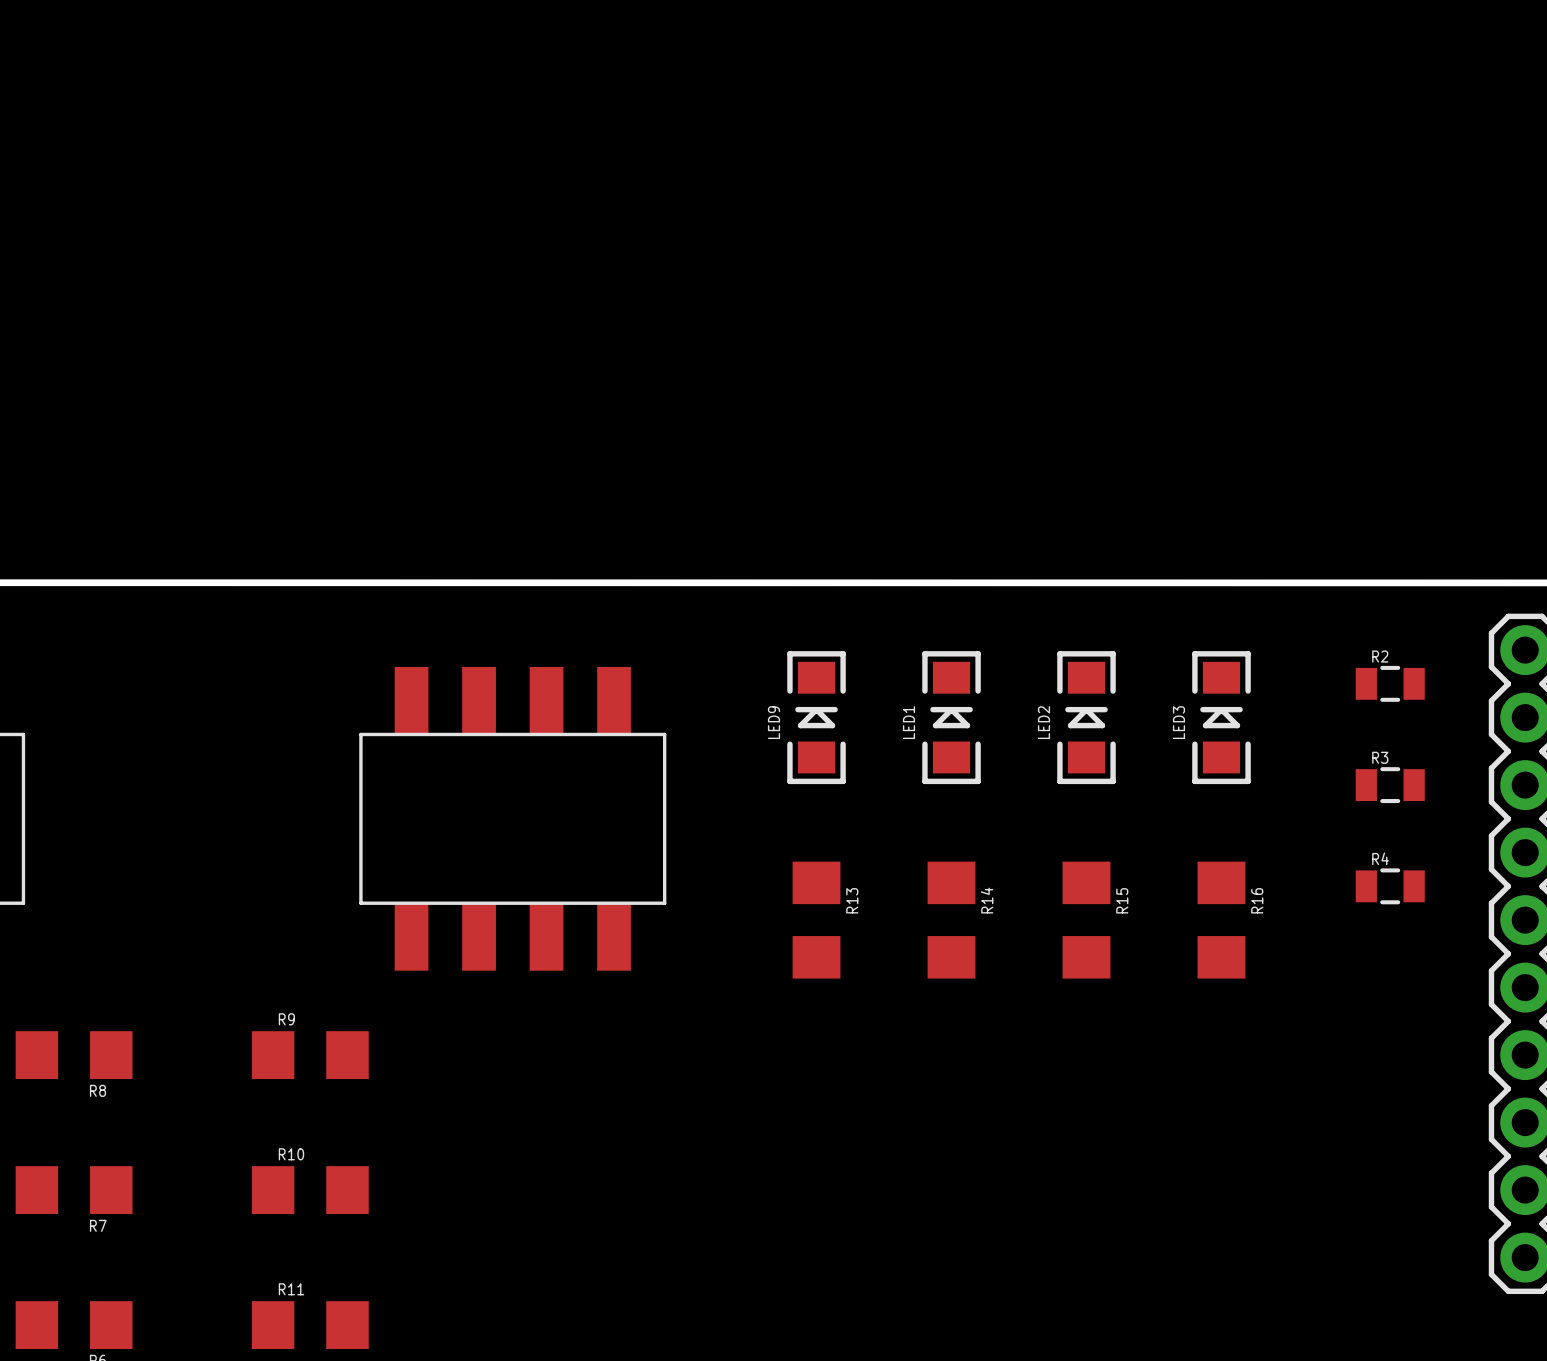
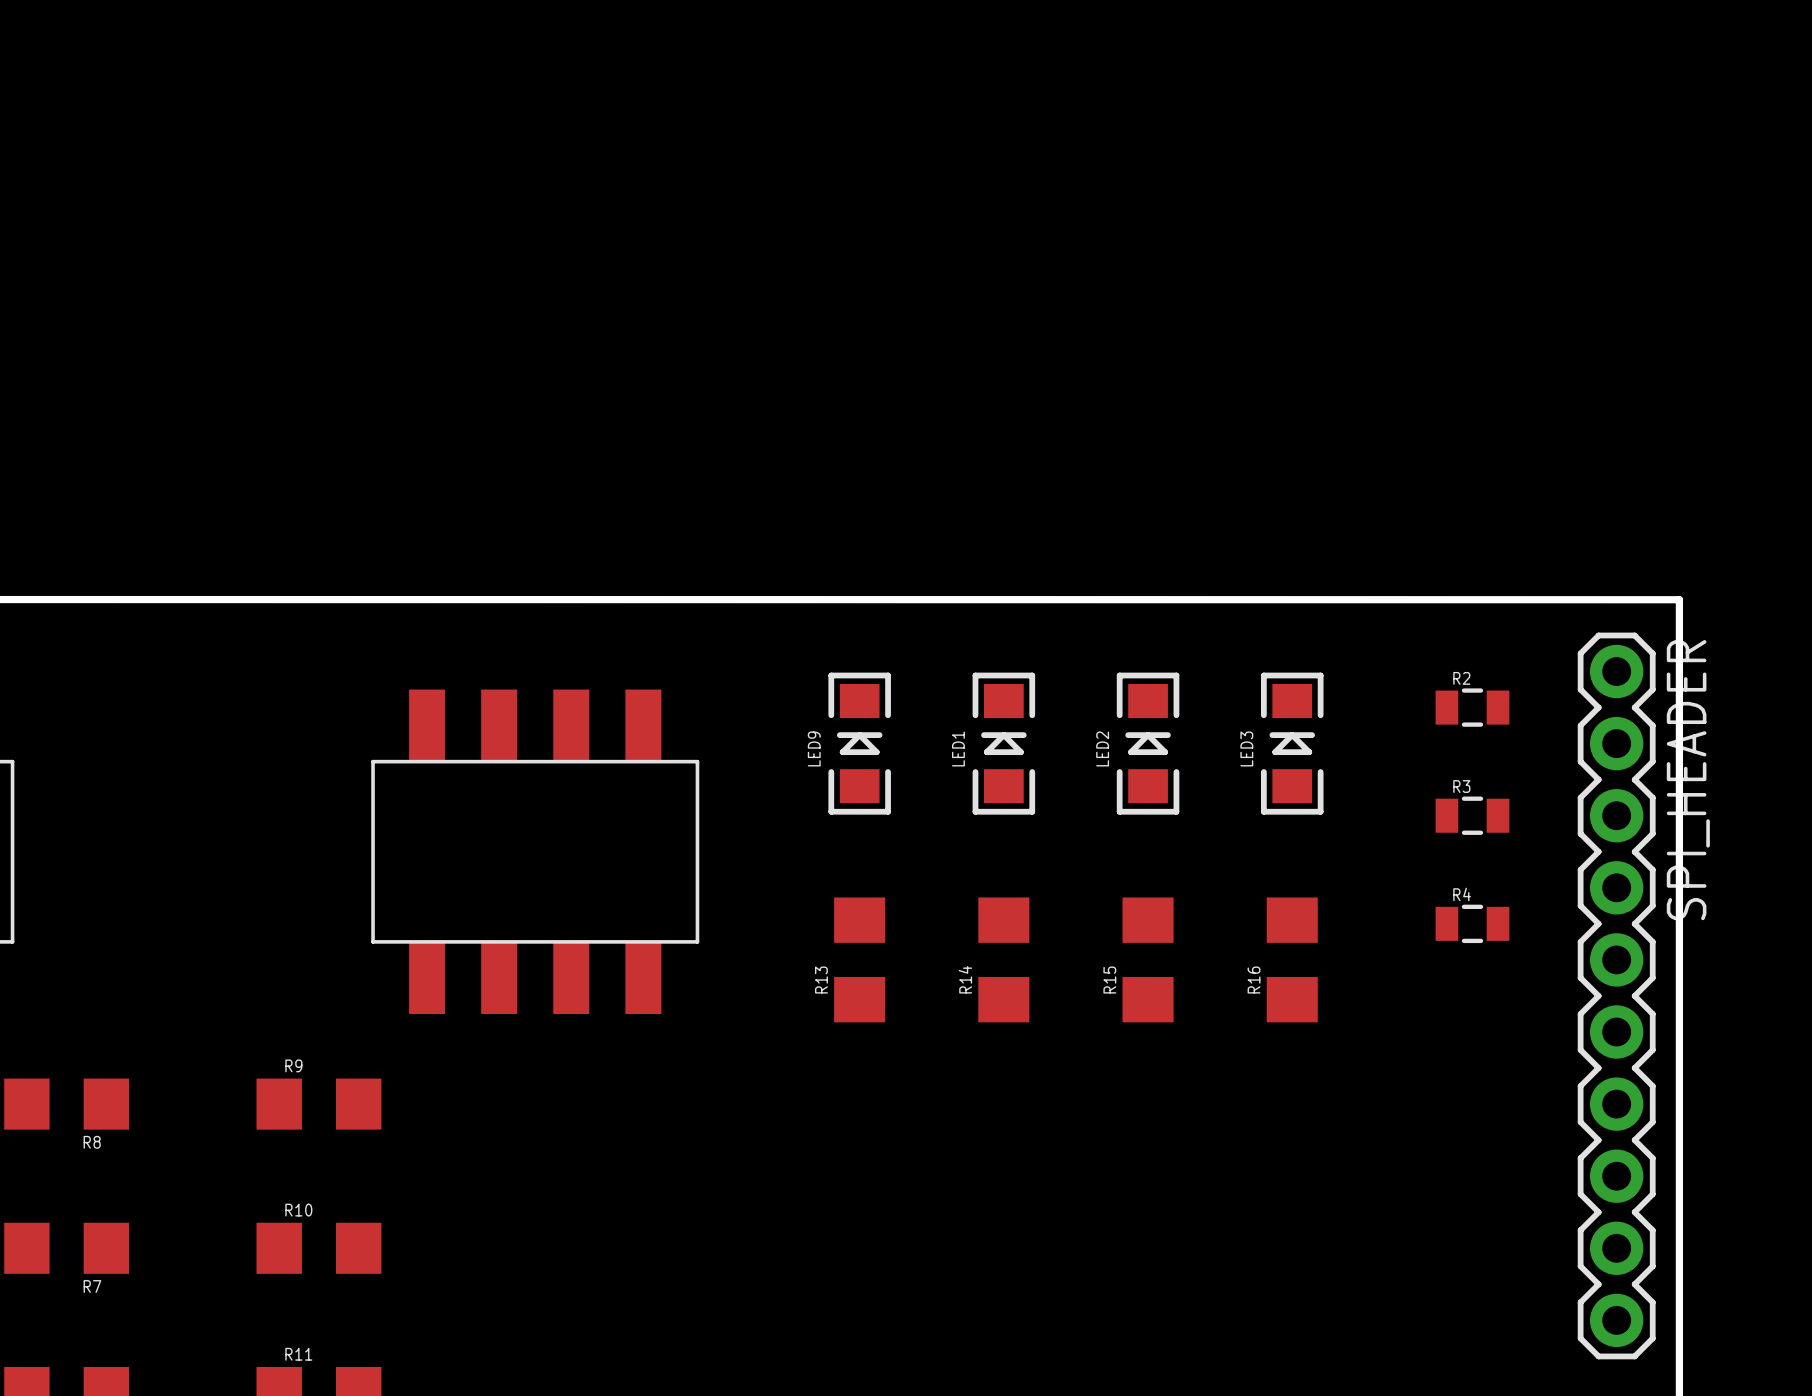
R13 name position: R13 (852, 900) -> R13 (821, 980)
R14 name position: R14 (987, 900) -> R14 (965, 979)
R15 name position: R15 (1122, 900) -> R15 (1109, 980)
R16 name position: R16 (1257, 900) -> R16 (1254, 980)

